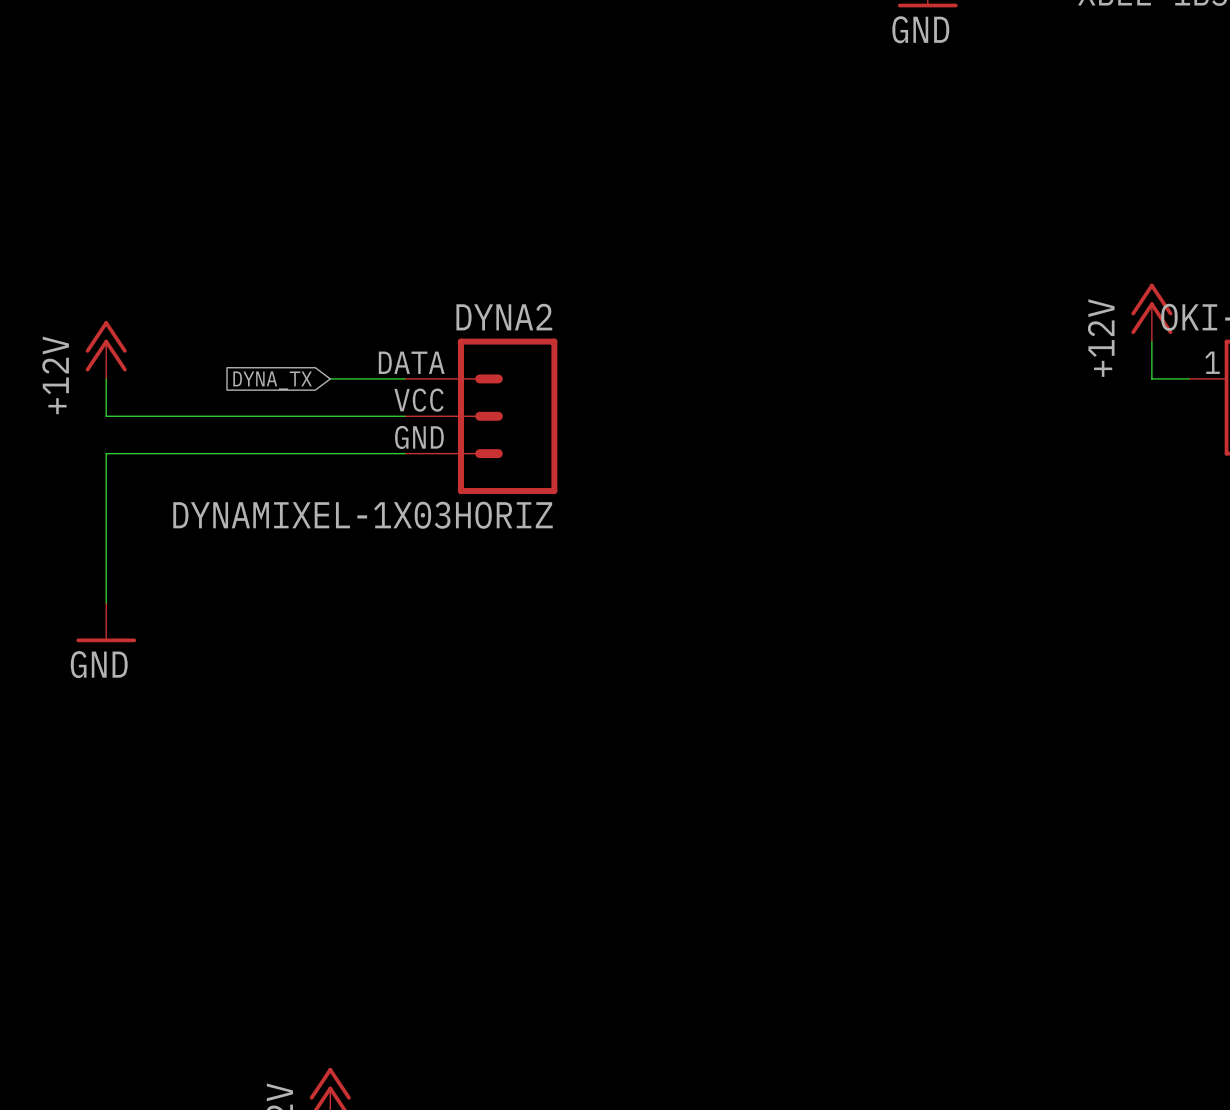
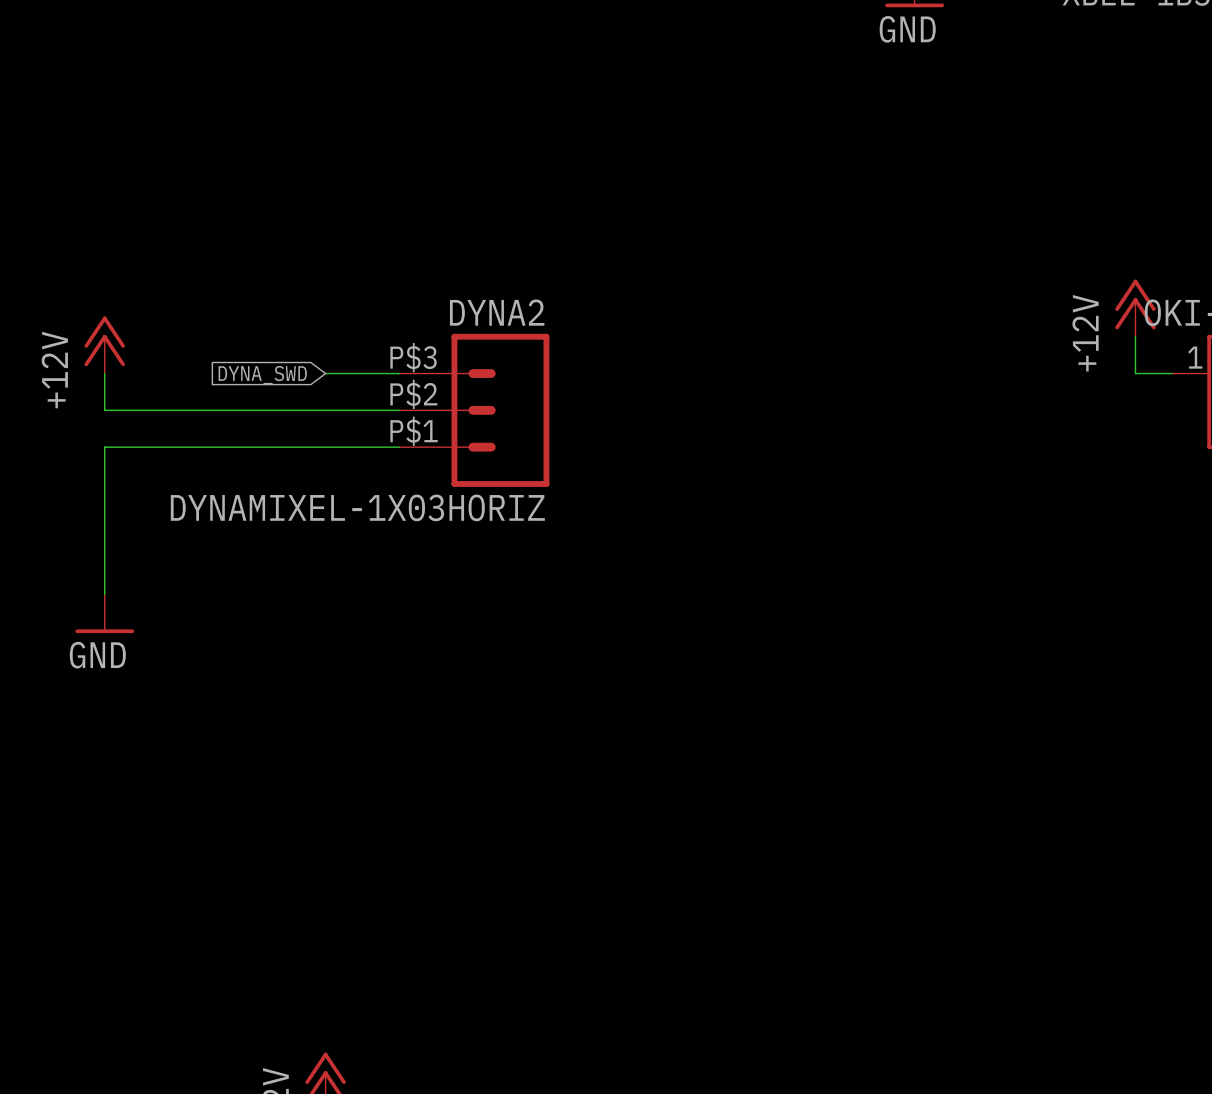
DYNA2 pin number: DATA (411, 362) -> P$3 (413, 357)
global label: DYNA_TX (272, 380) -> DYNA_SWD (262, 375)
DYNA2 pin number: VCC (419, 400) -> P$2 (413, 394)
DYNA2 pin number: GND (419, 437) -> P$1 (414, 431)

